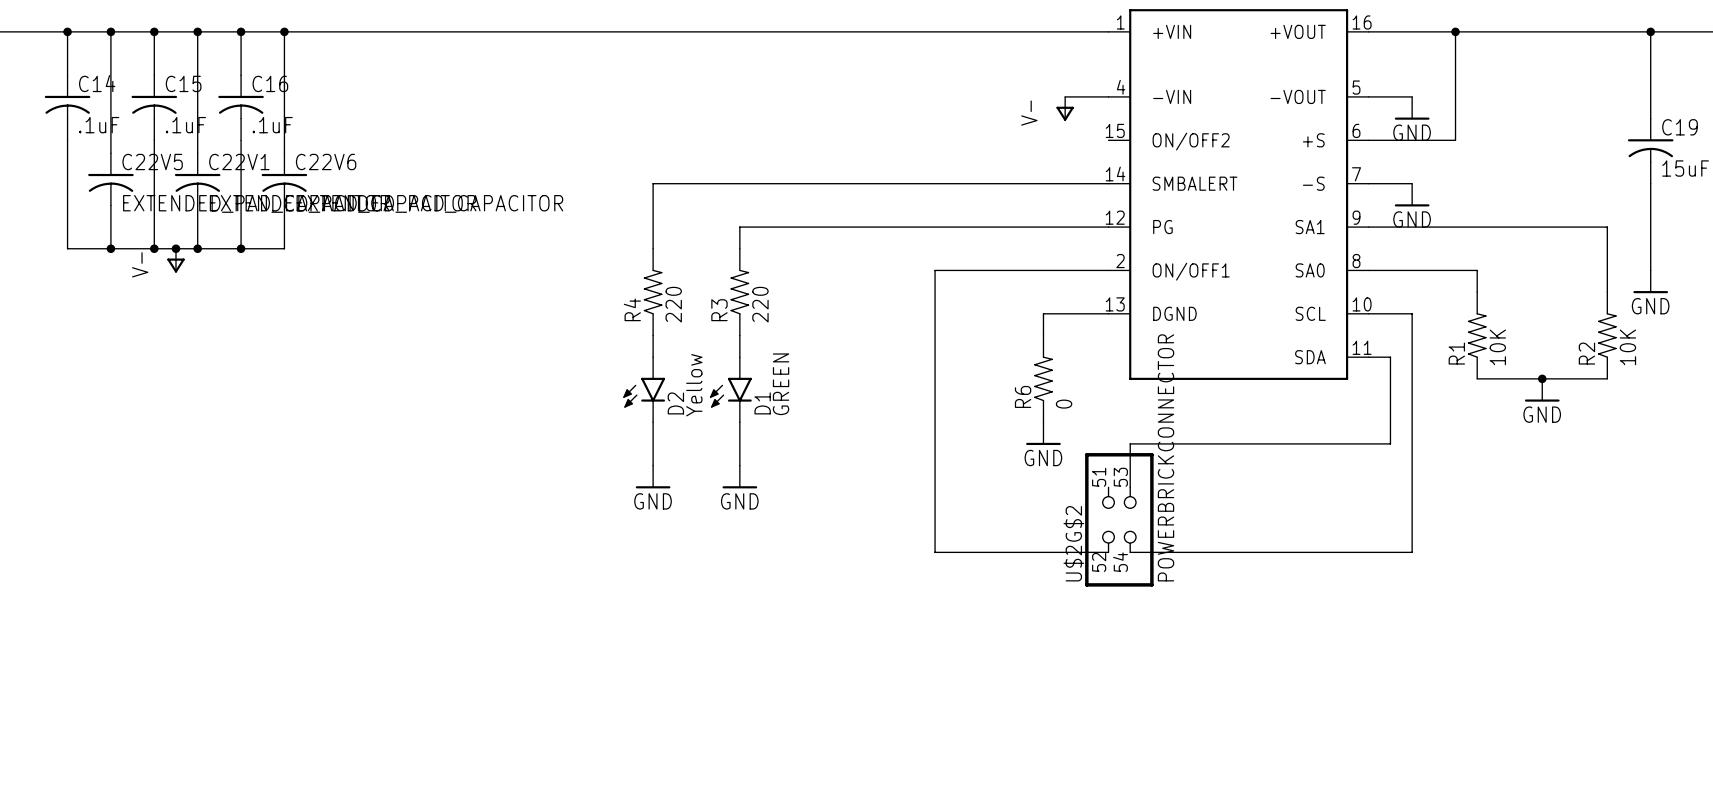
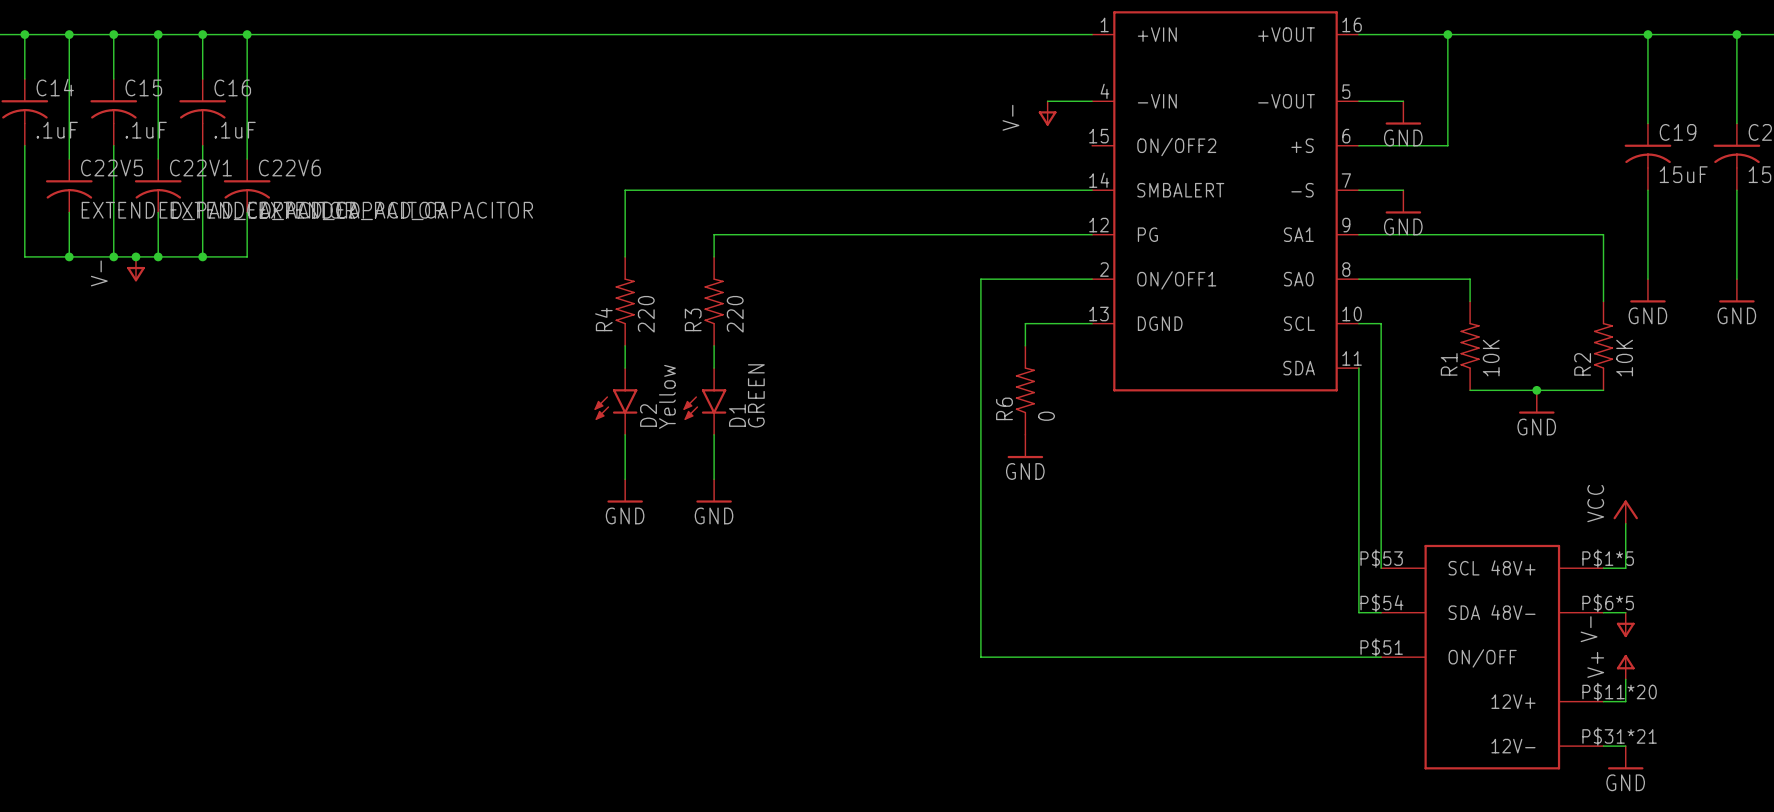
wire: (1000, 270) (935, 270) (935, 552) (1108, 552) -> (980, 279) (980, 657) (1381, 657)
wire: (1390, 313) (1412, 313) (1412, 552) (1130, 552) -> none
wire: (1368, 357) (1390, 357) -> (1381, 323) (1381, 368)
wire: none -> (1358, 368) (1358, 612) (1381, 612)
wire: (1390, 443) (1130, 443) (1130, 487) -> (1381, 457) (1381, 568)
power symbol: none -> VCC (1625, 512)
wire: none -> (1625, 523) (1625, 568) (1603, 568)
U$2G$2: POWERBRICKCONNECTOR (1119, 519) -> none
wire: none -> (1603, 612) (1625, 612)
power symbol: none -> V- (1625, 624)
part: none -> (1492, 657)
power symbol: none -> V+ (1625, 667)
wire: none -> (1625, 679) (1625, 701) (1603, 701)
wire: none -> (1603, 746) (1625, 746)
power symbol: none -> GND (1625, 757)

